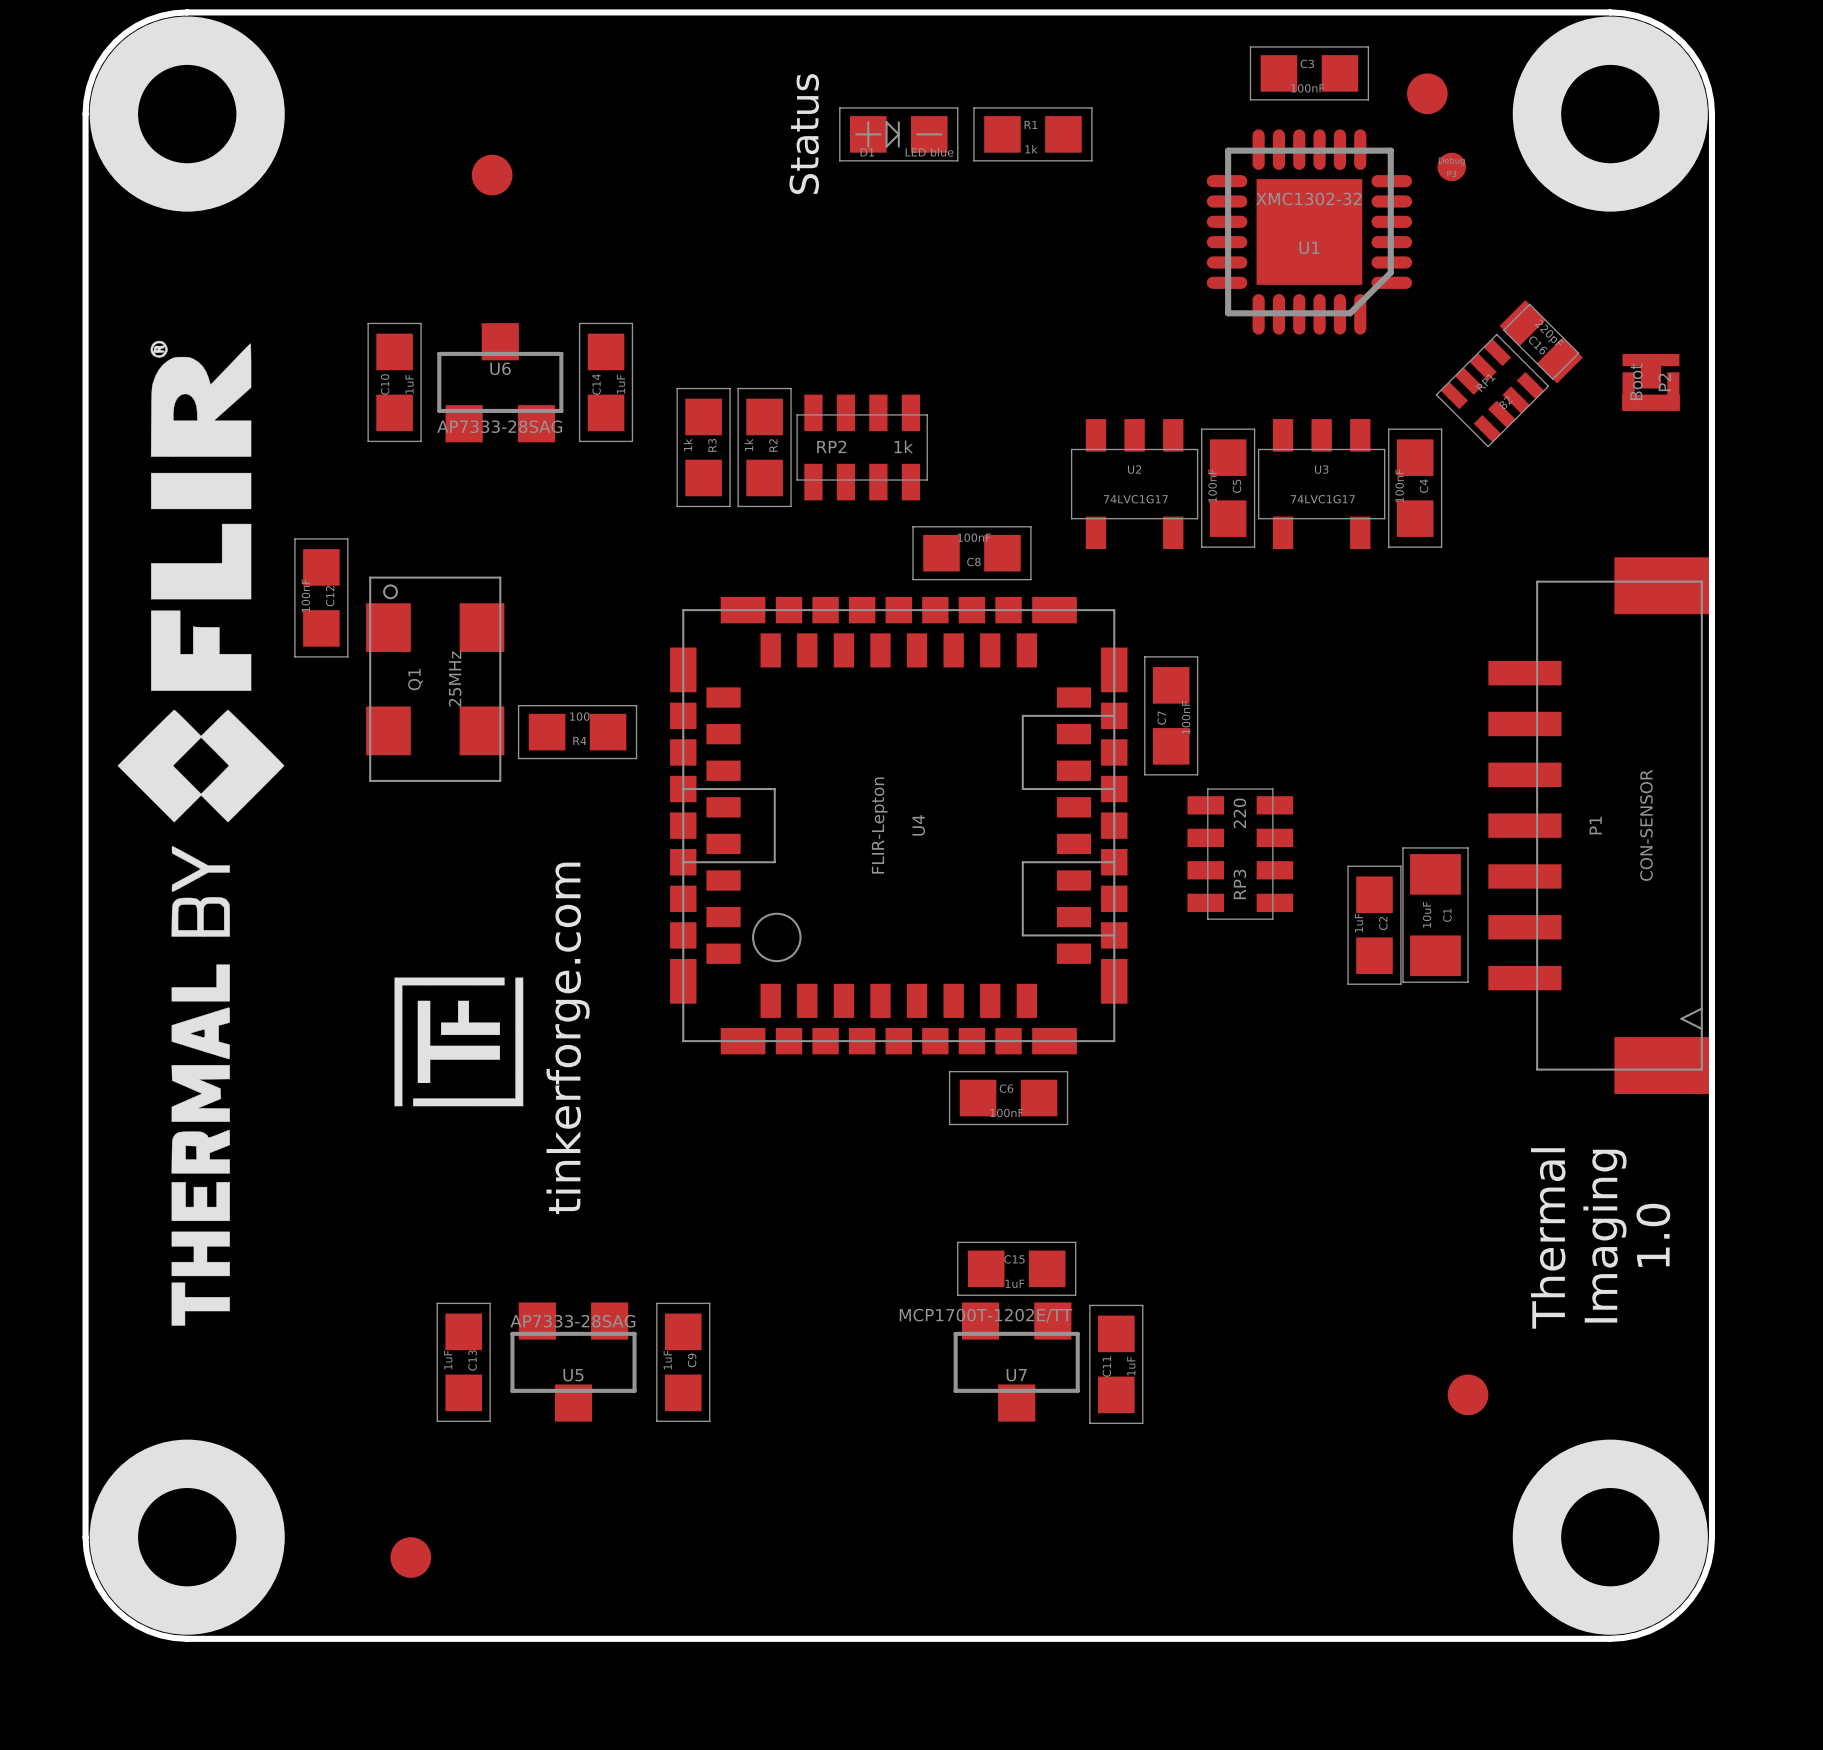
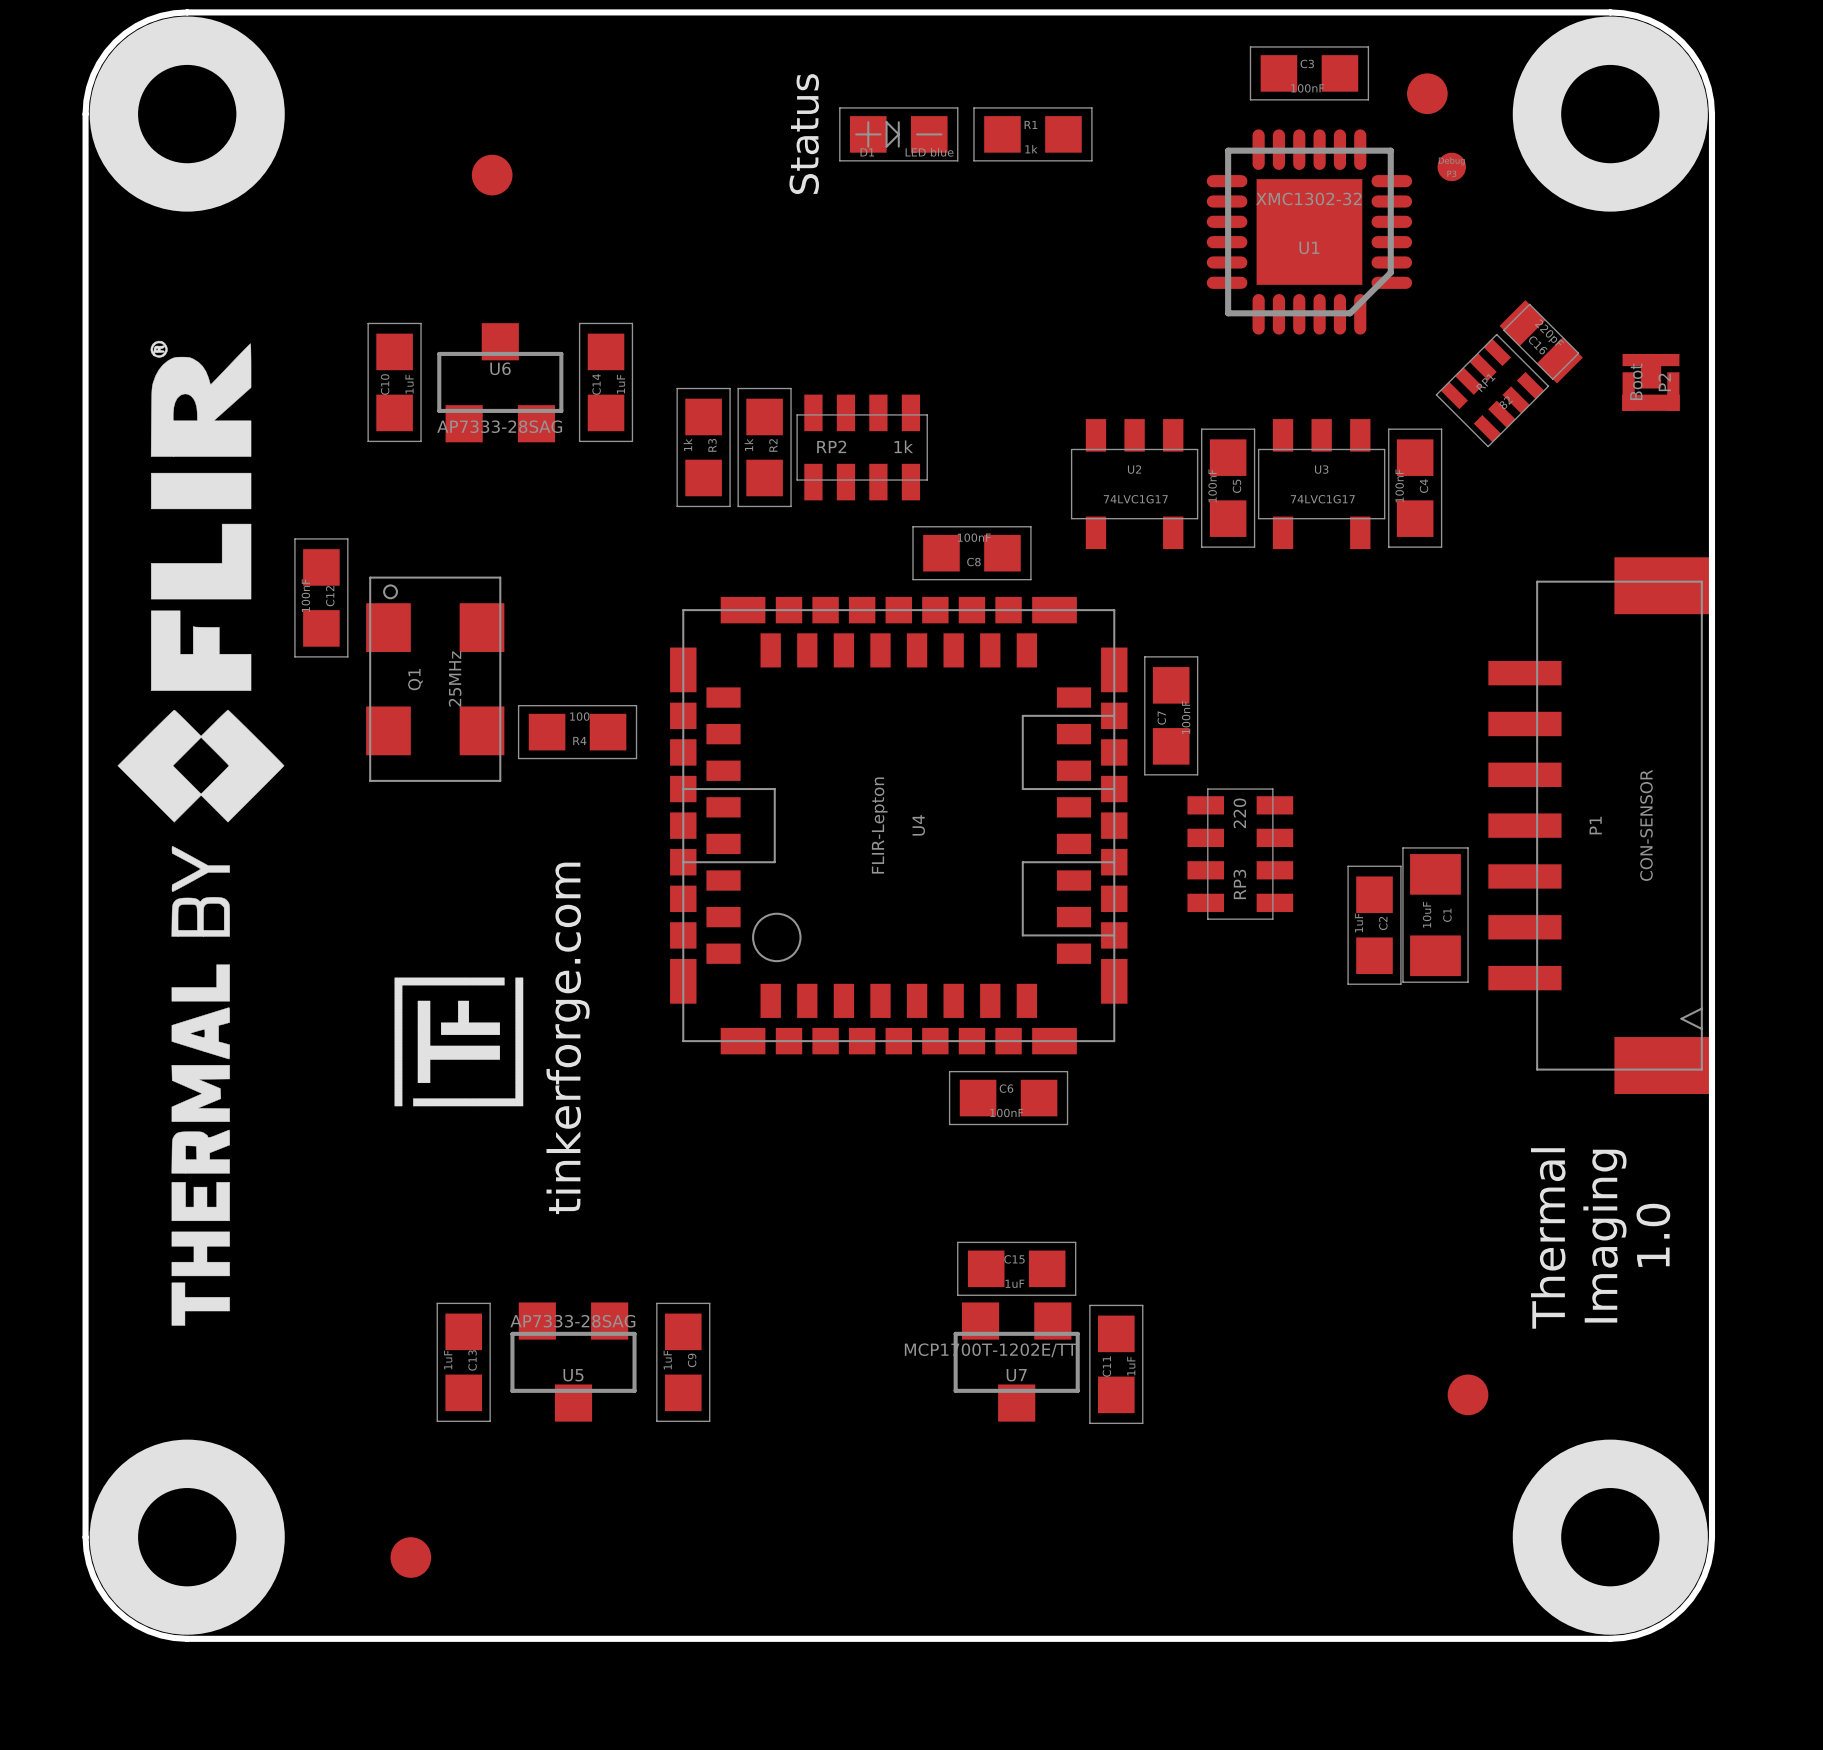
U7 value position: MCP1700T-1202E/TT (986, 1315) -> MCP1700T-1202E/TT (991, 1350)

